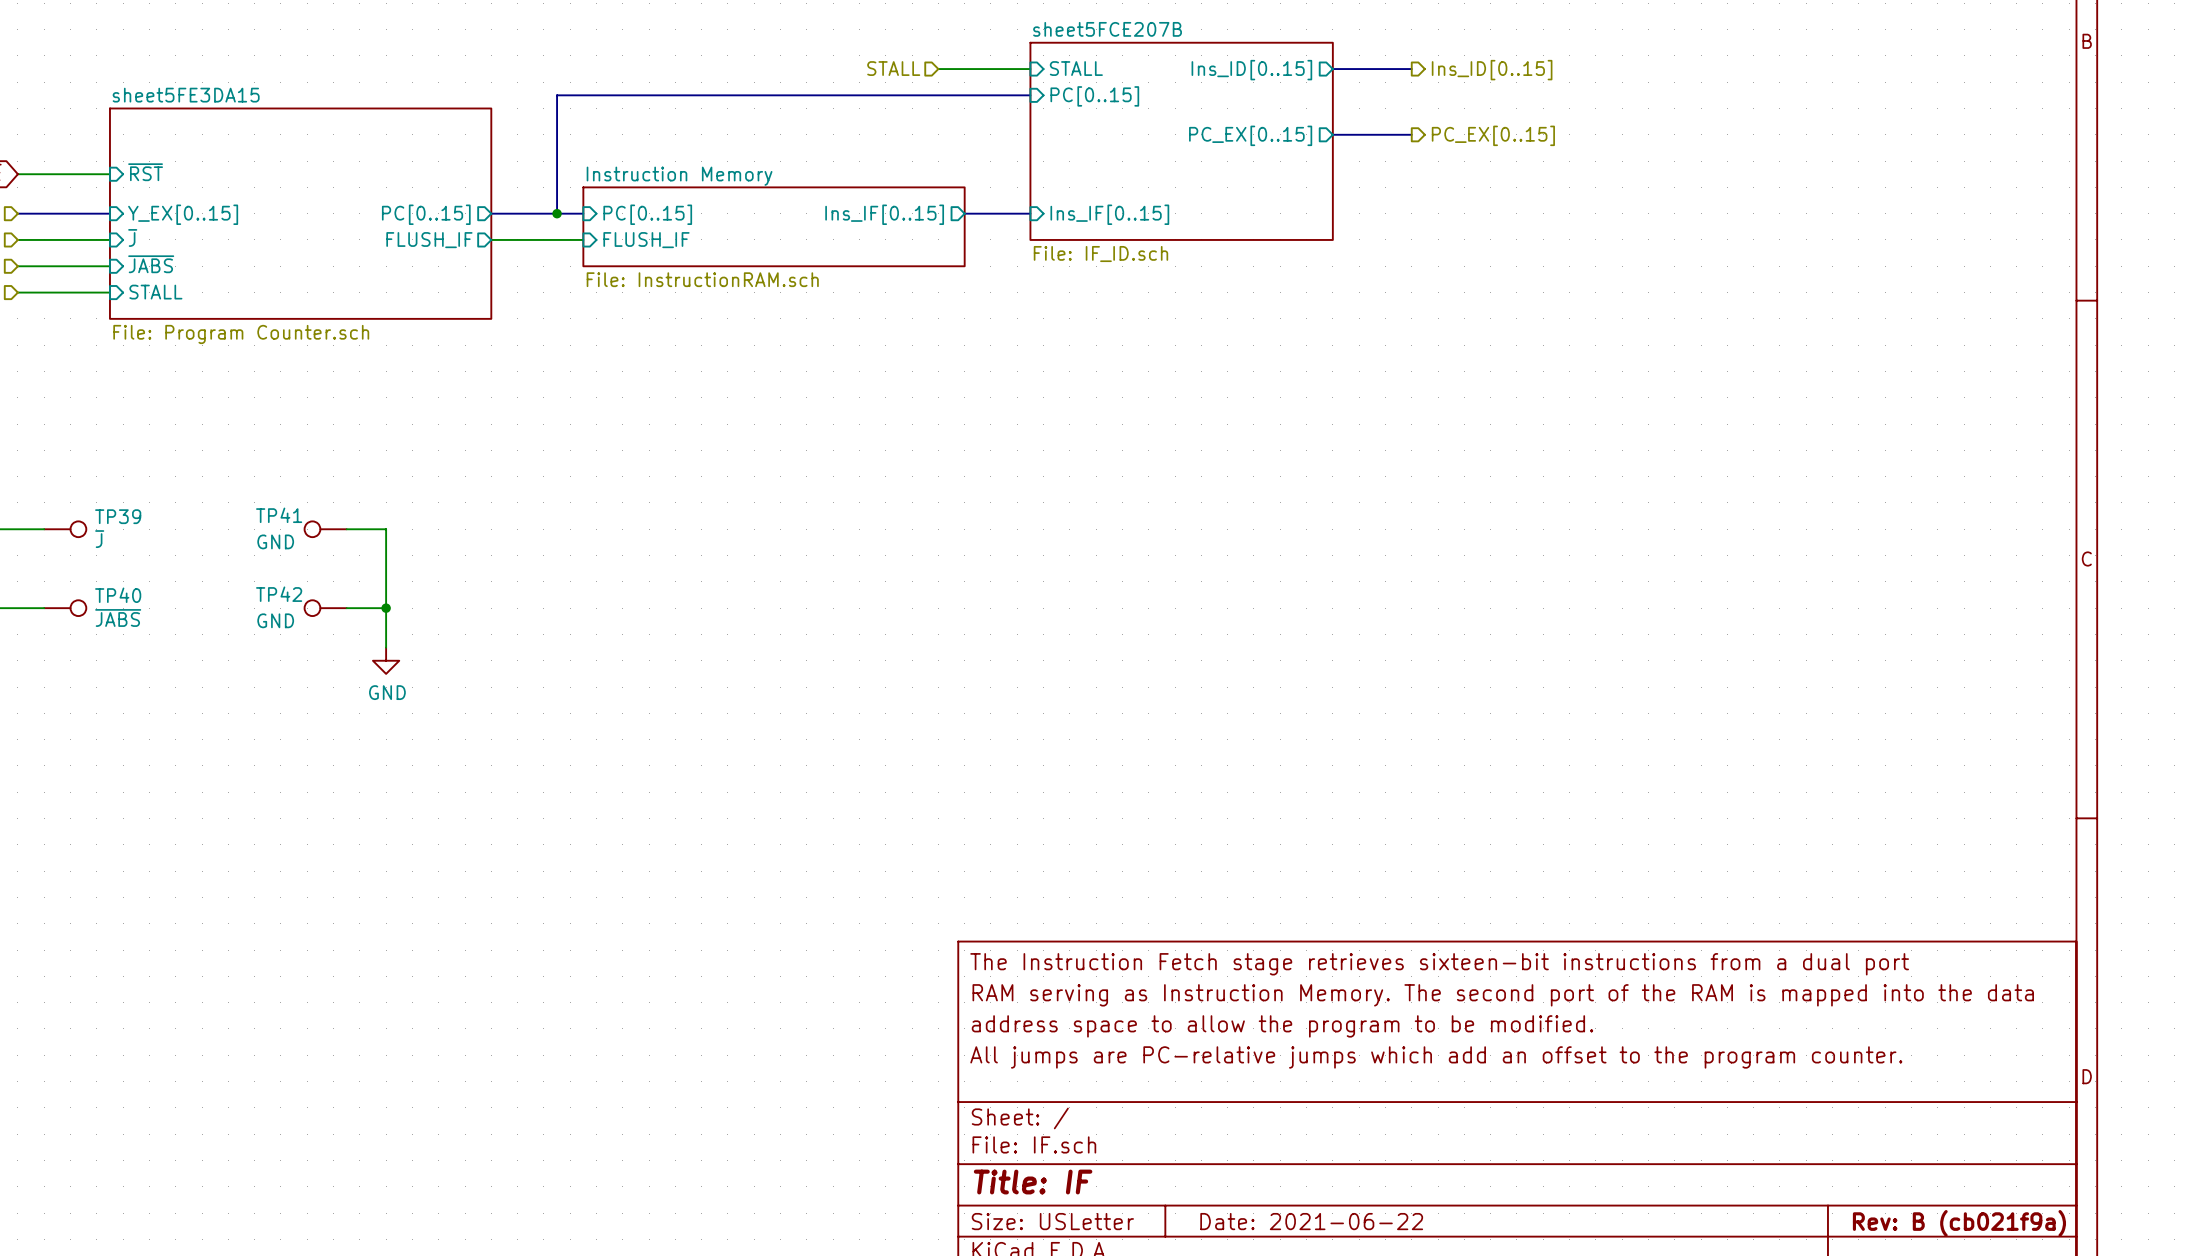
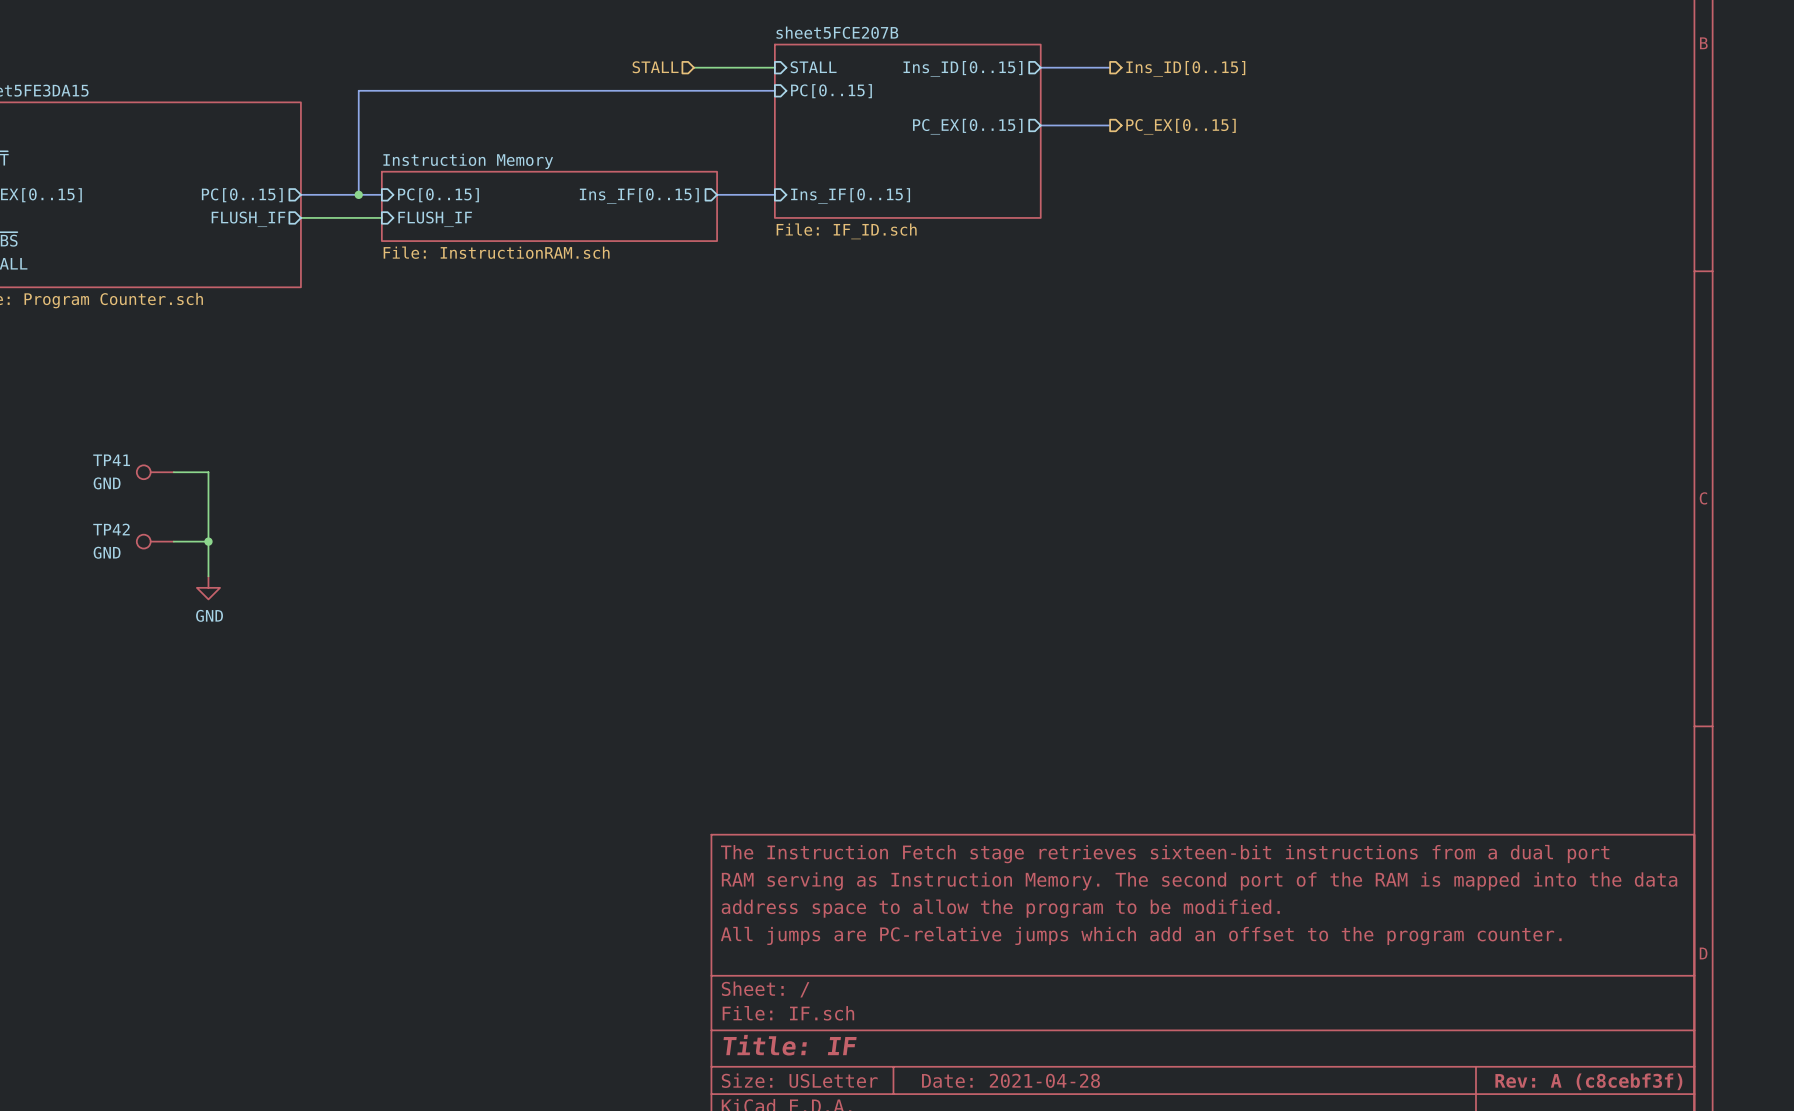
title block: Date: 2021-06-22 (1311, 1221) -> Date: 2021-04-28 (1010, 1080)
title block: Rev: B (cb021f9a) (1959, 1223) -> Rev: A (c8cebf3f) (1588, 1081)

